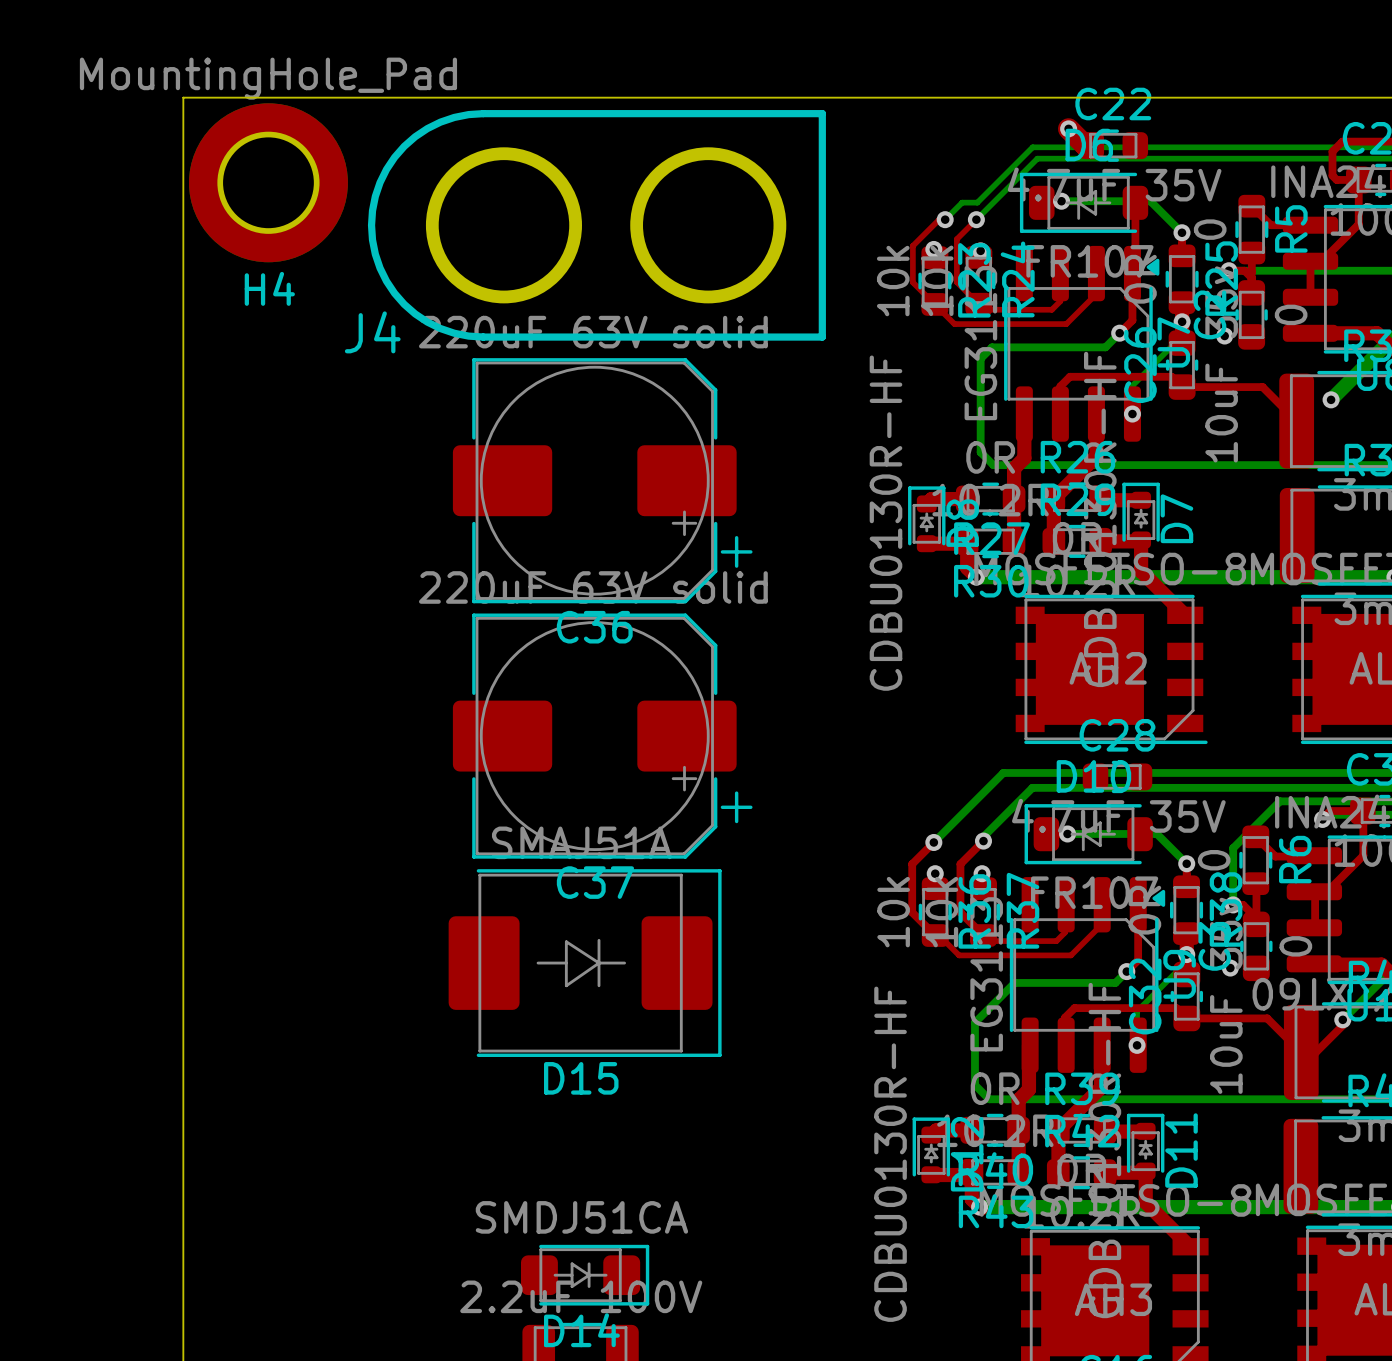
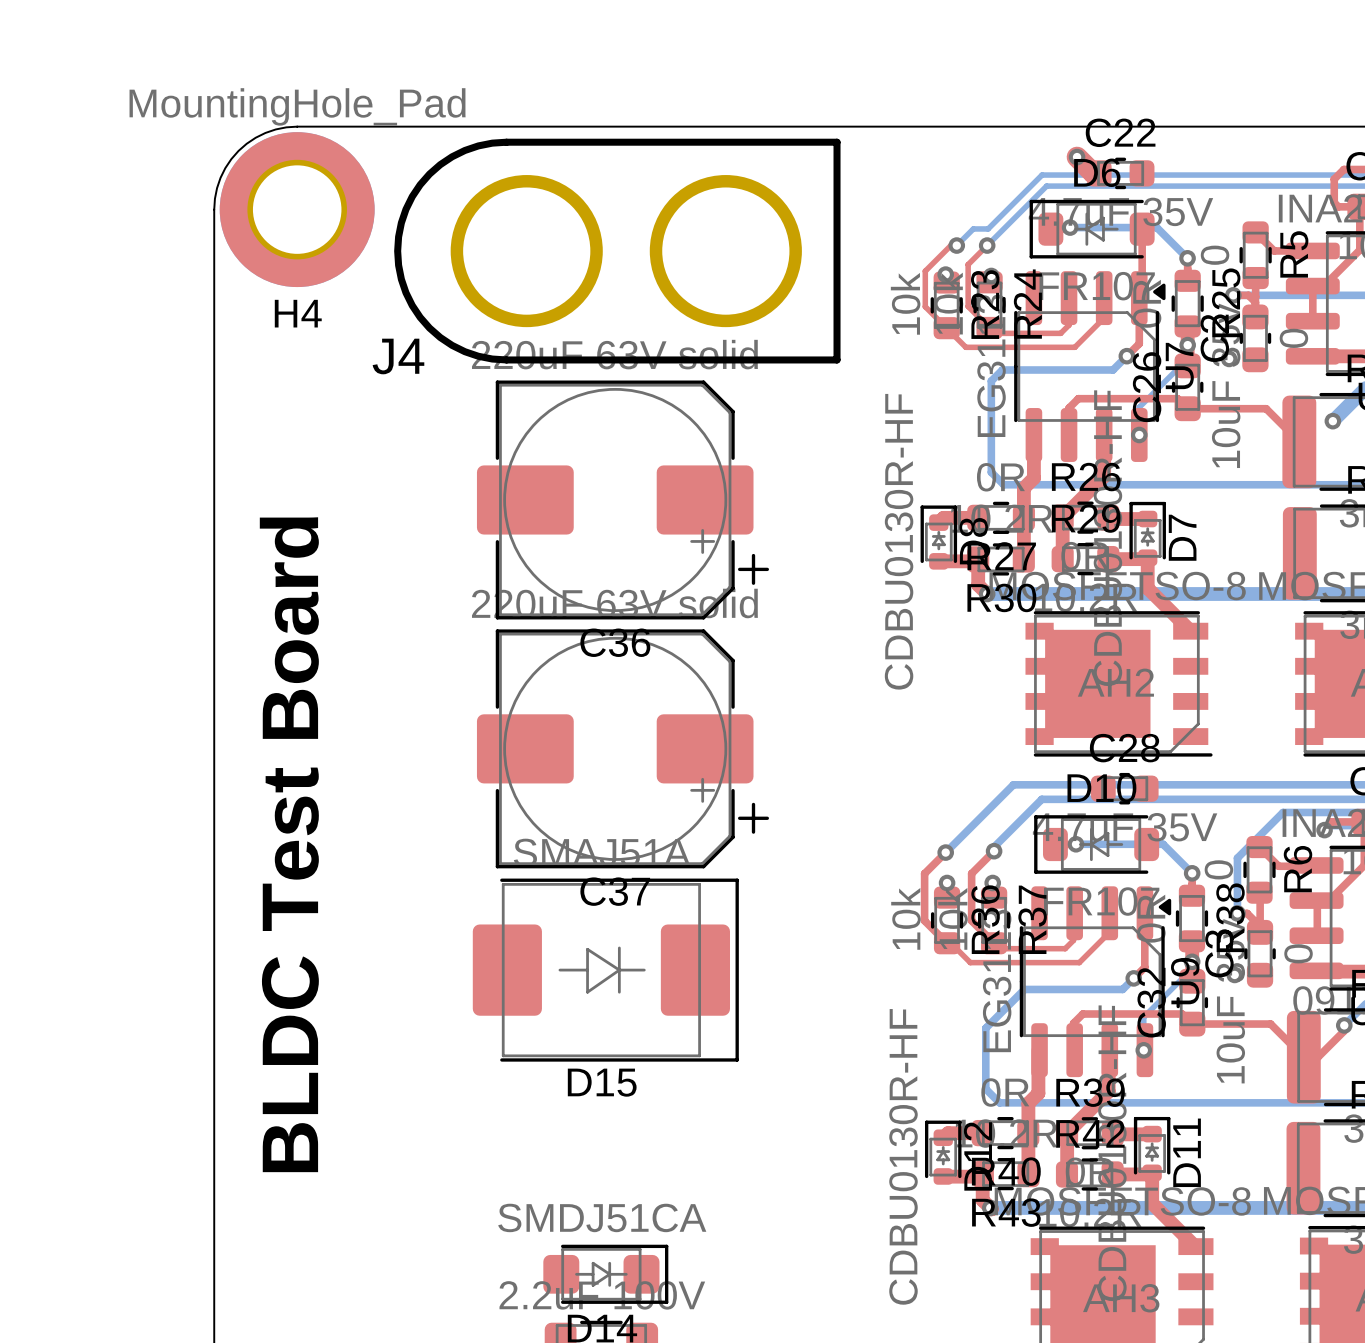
board edge: (268, 97) (183, 97) (183, 182) -> (297, 126) (265, 132) (238, 150) (220, 177) (214, 209)
text: none -> BLDC Test Board (289, 844)

